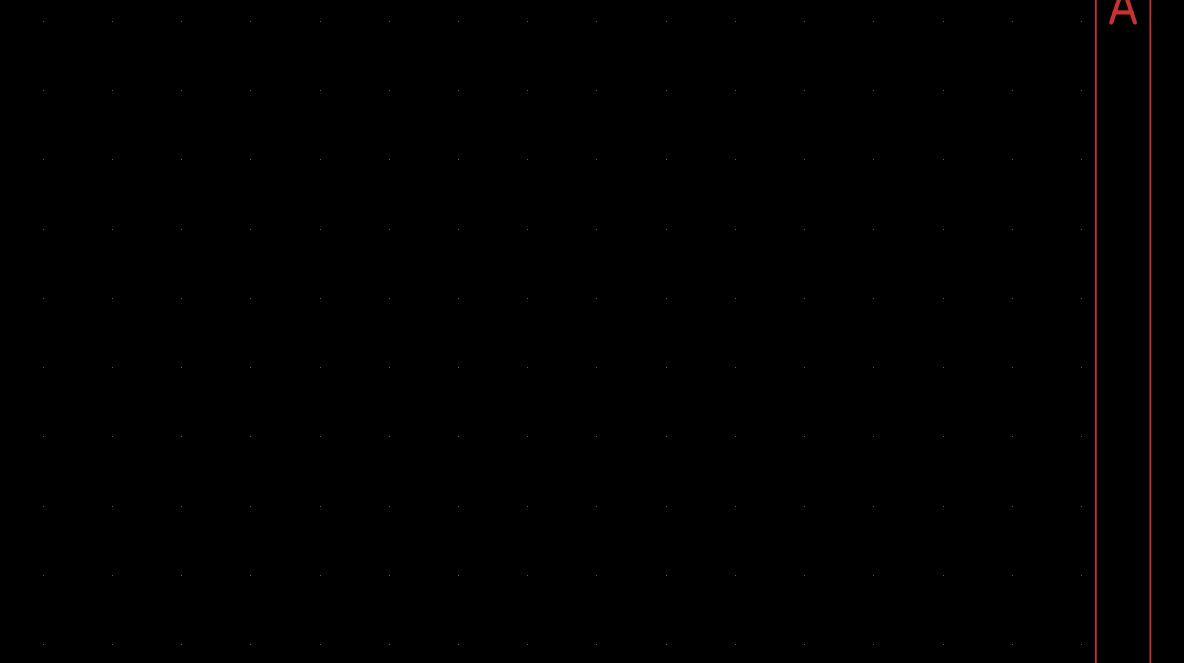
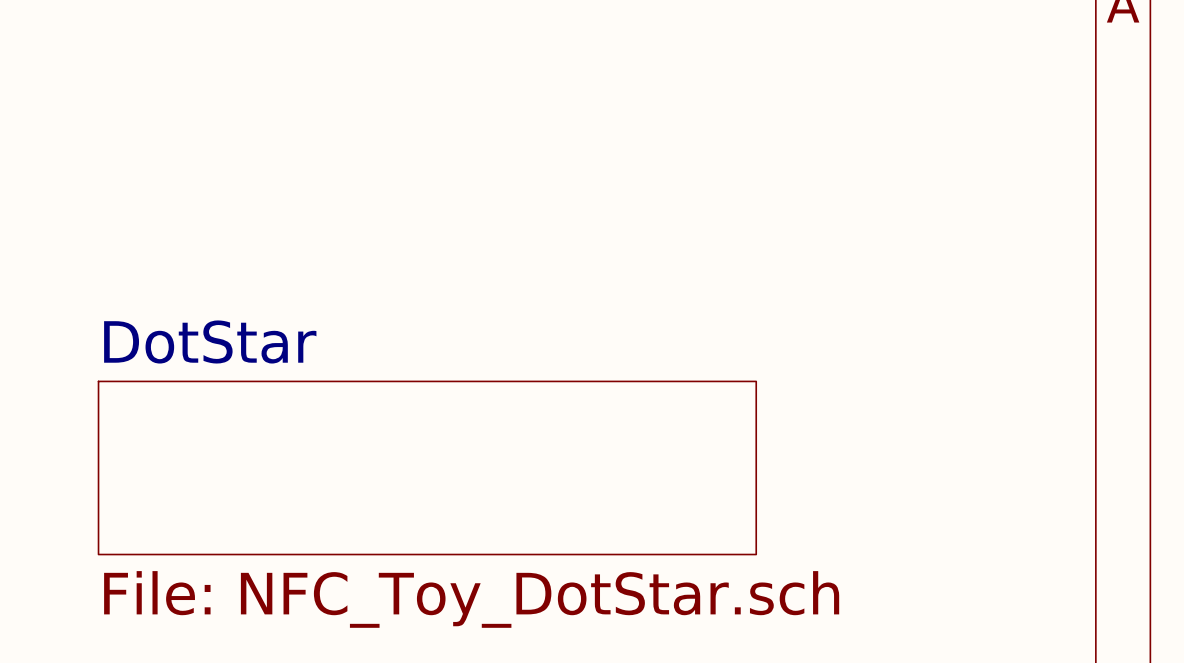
sheet DotStar: none -> File: NFC_Toy_DotStar.sch (427, 467)

